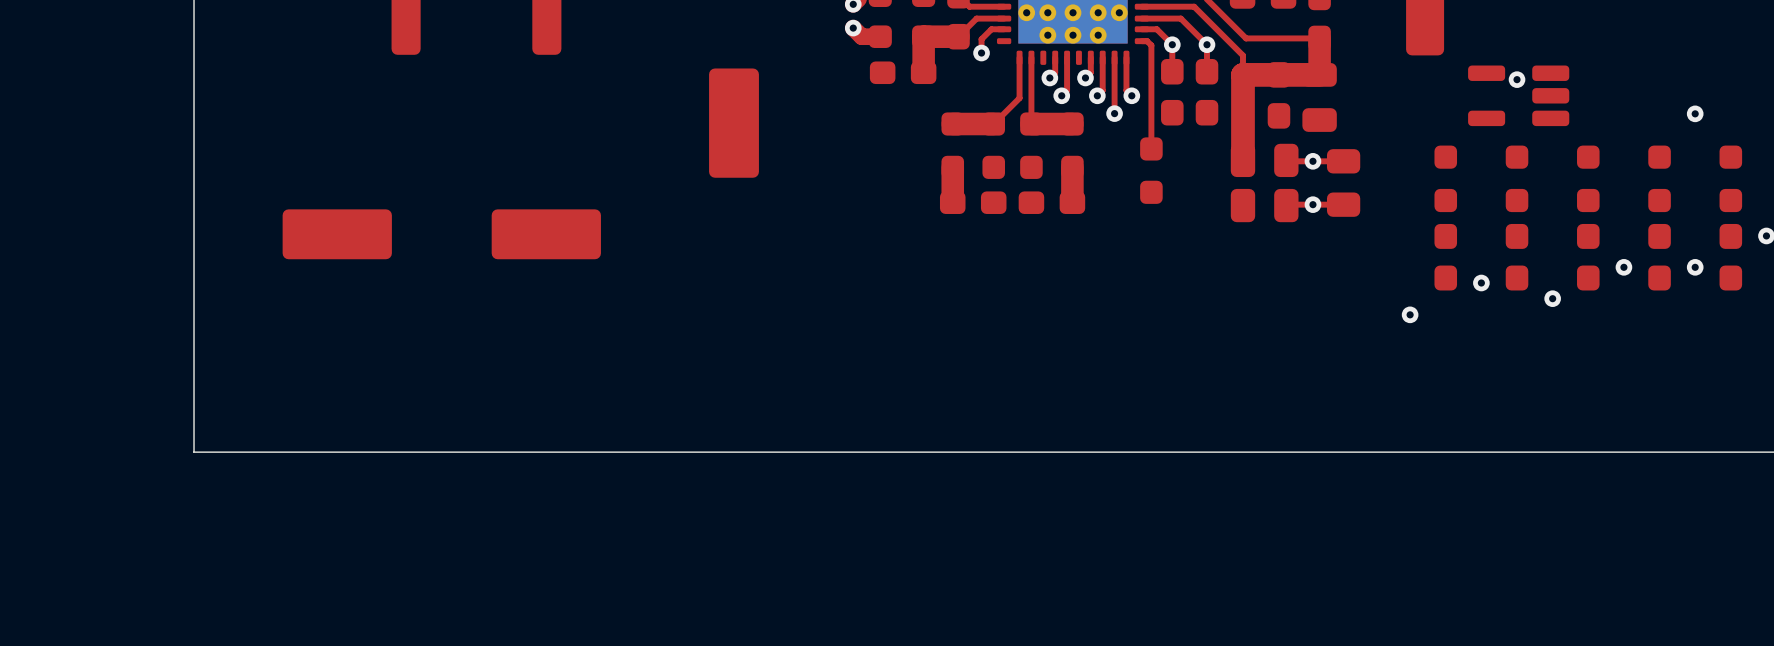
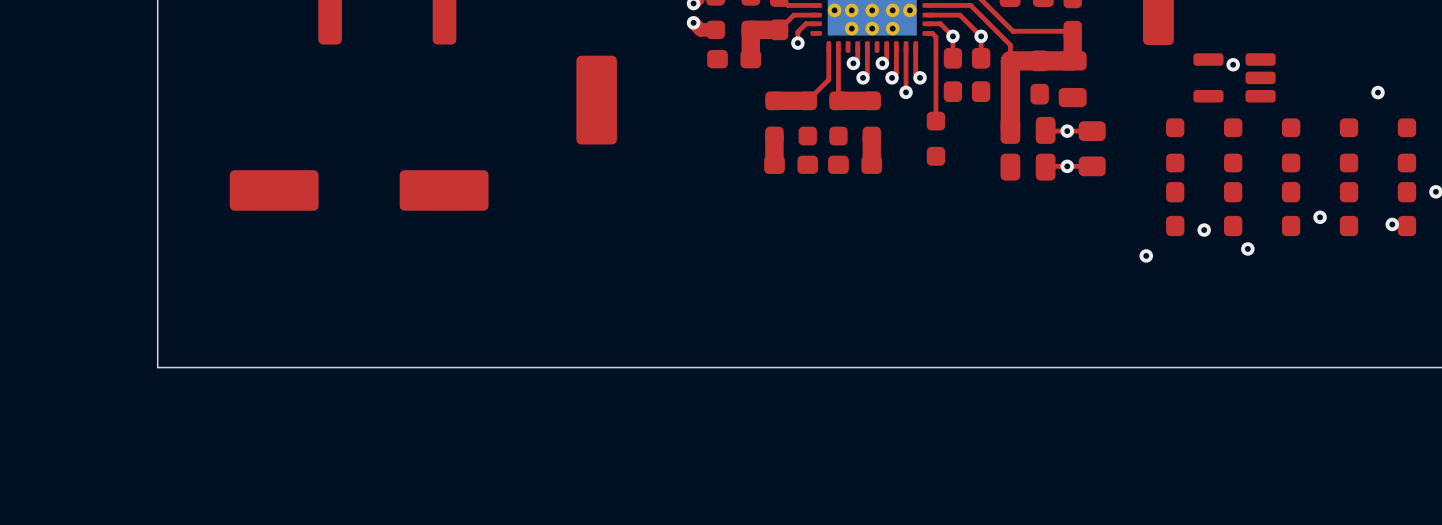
via position: (1695, 267) -> (1392, 224)
via position: (1552, 298) -> (1247, 248)

